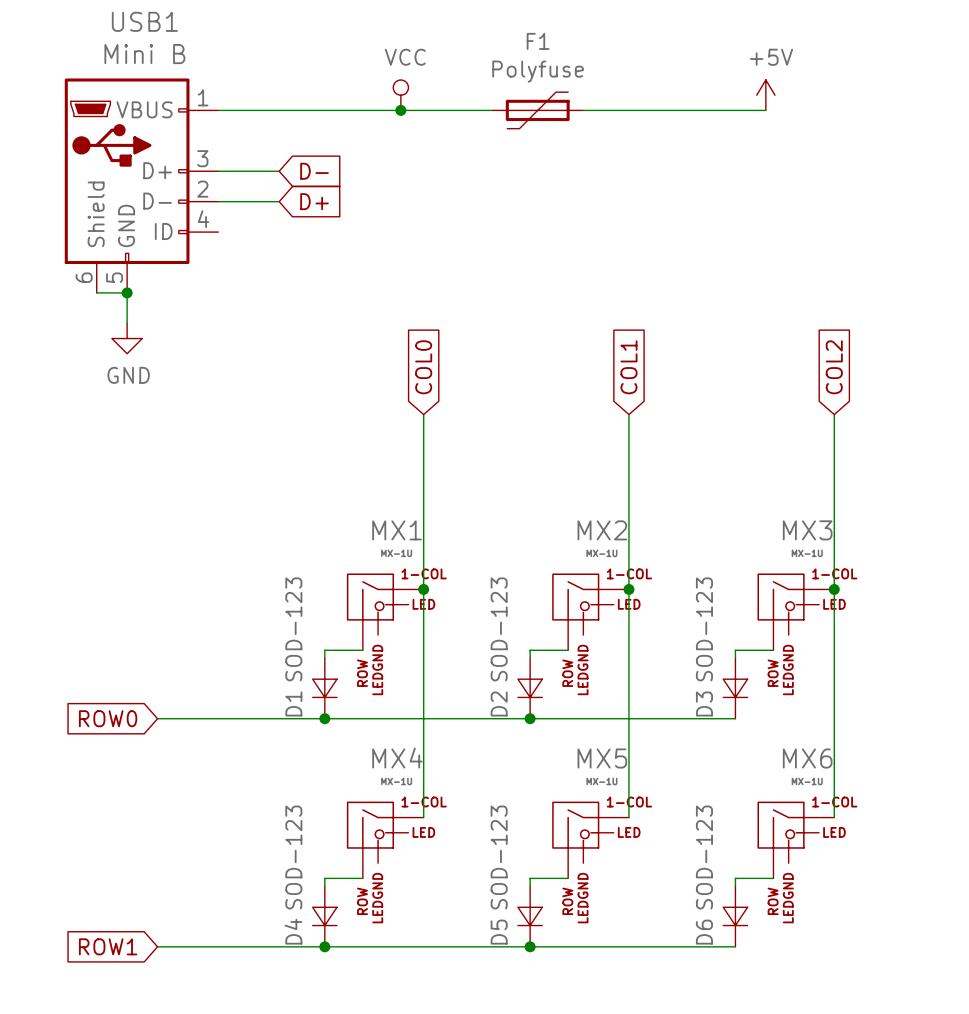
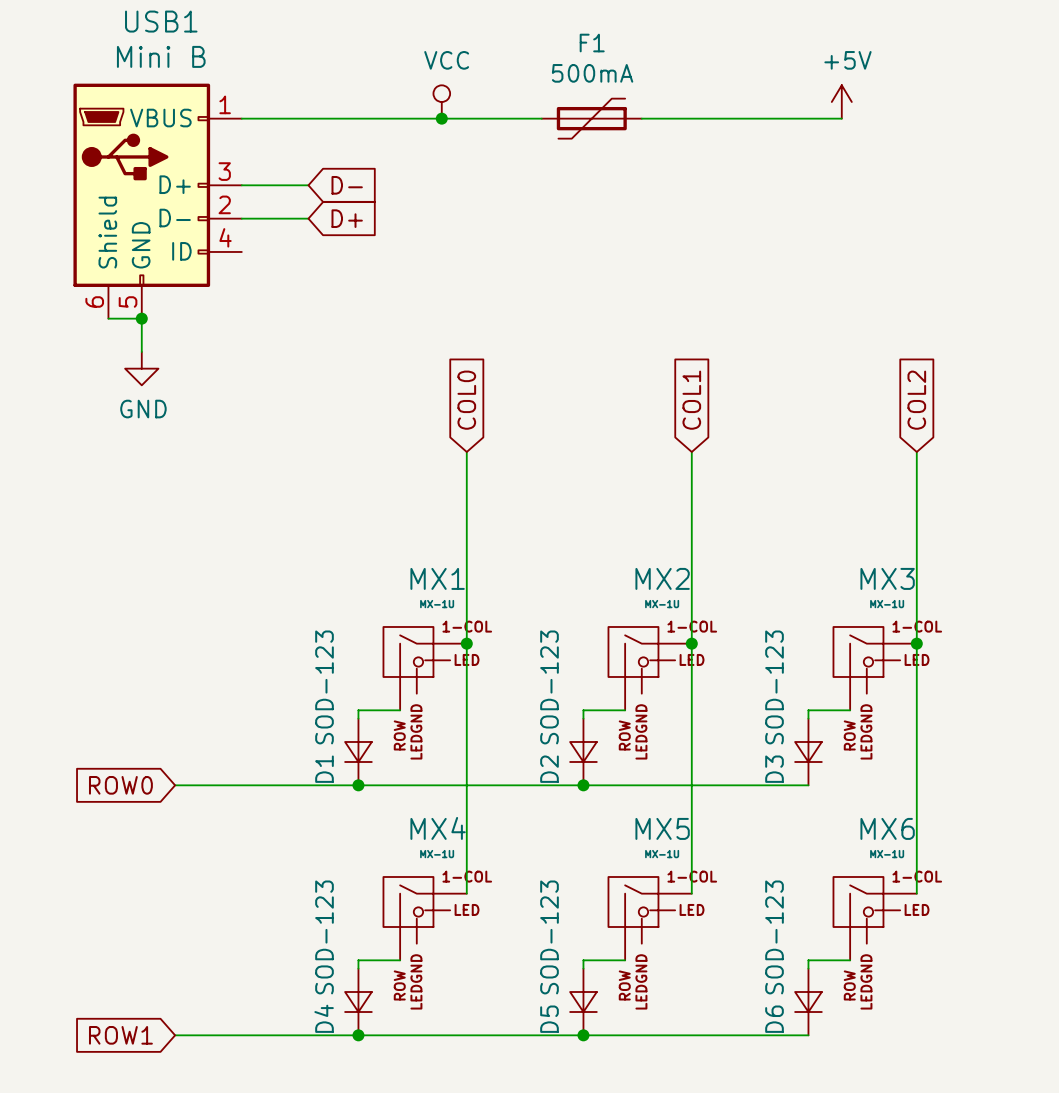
F1 value: Polyfuse (538, 71) -> 500mA (592, 73)

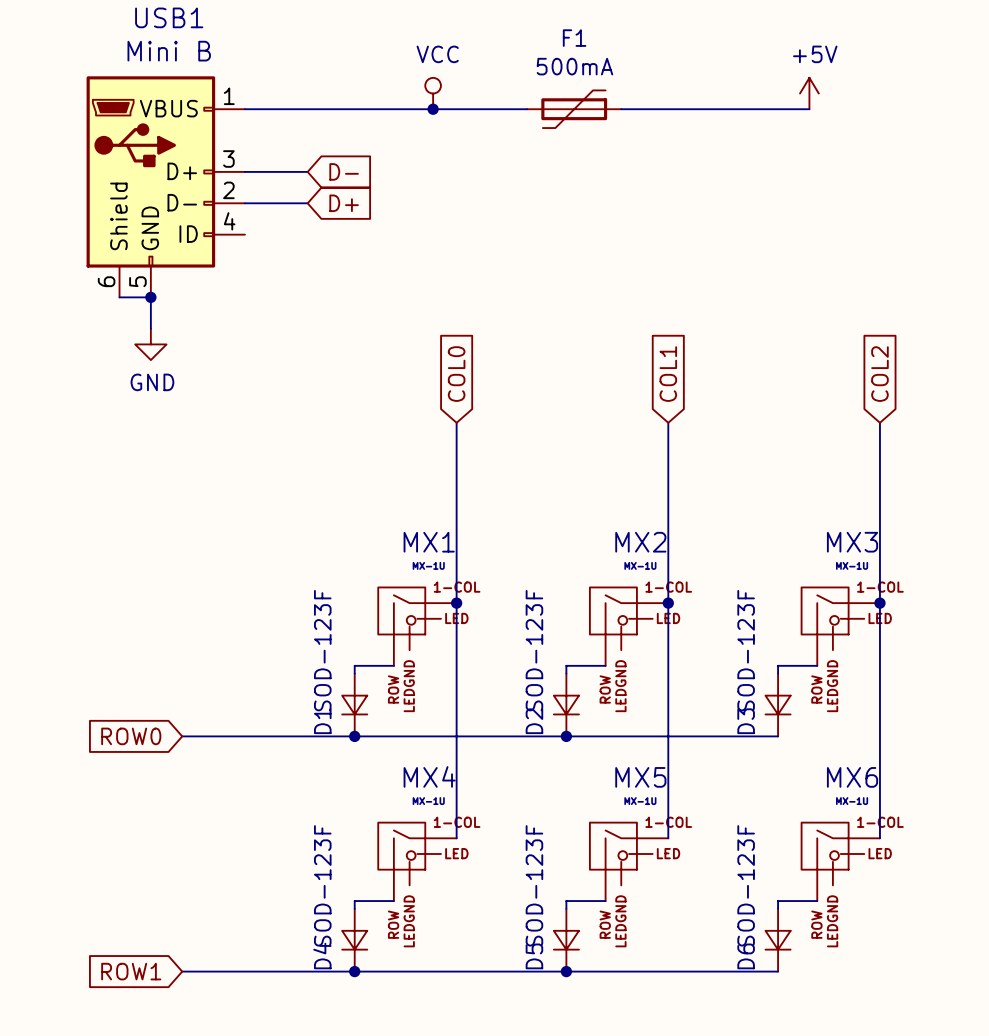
D1 value: SOD-123 (324, 687) -> SOD-123F (322, 650)
D2 value: SOD-123 (549, 687) -> SOD-123F (534, 650)
D3 value: SOD-123 (774, 687) -> SOD-123F (746, 650)
D4 value: SOD-123 (324, 937) -> SOD-123F (322, 885)
D5 value: SOD-123 (549, 937) -> SOD-123F (534, 885)
D6 value: SOD-123 (774, 937) -> SOD-123F (746, 885)

